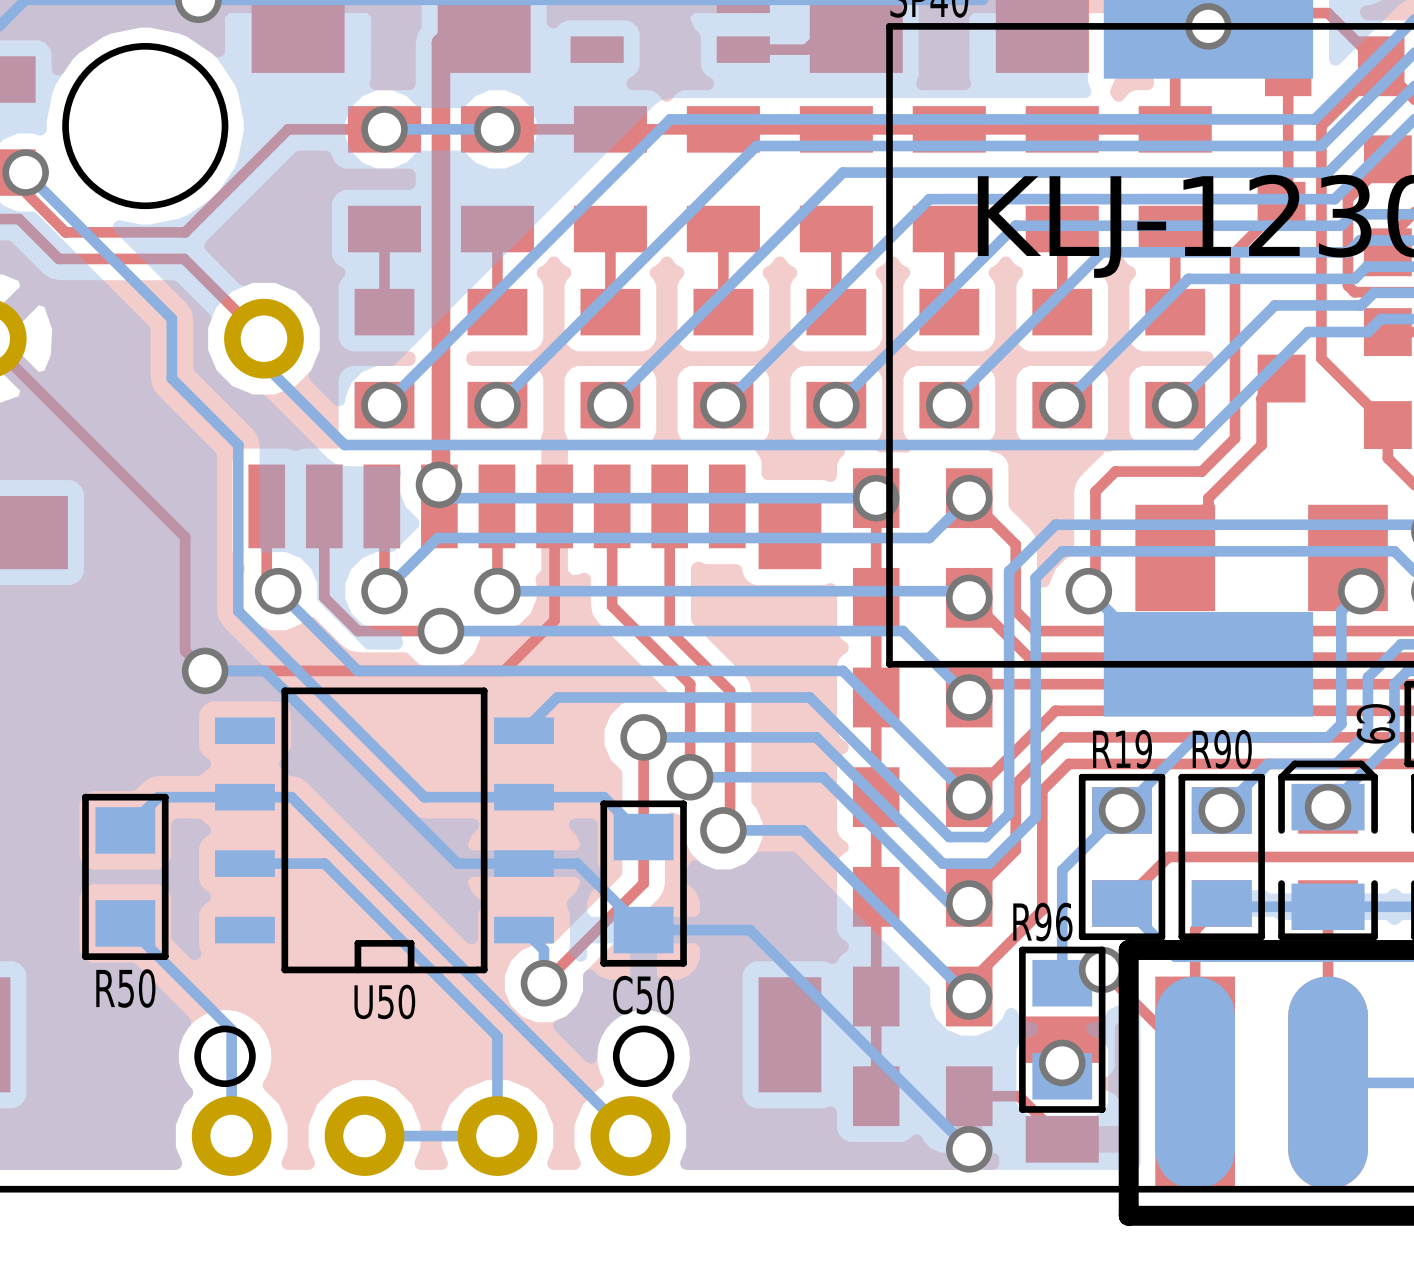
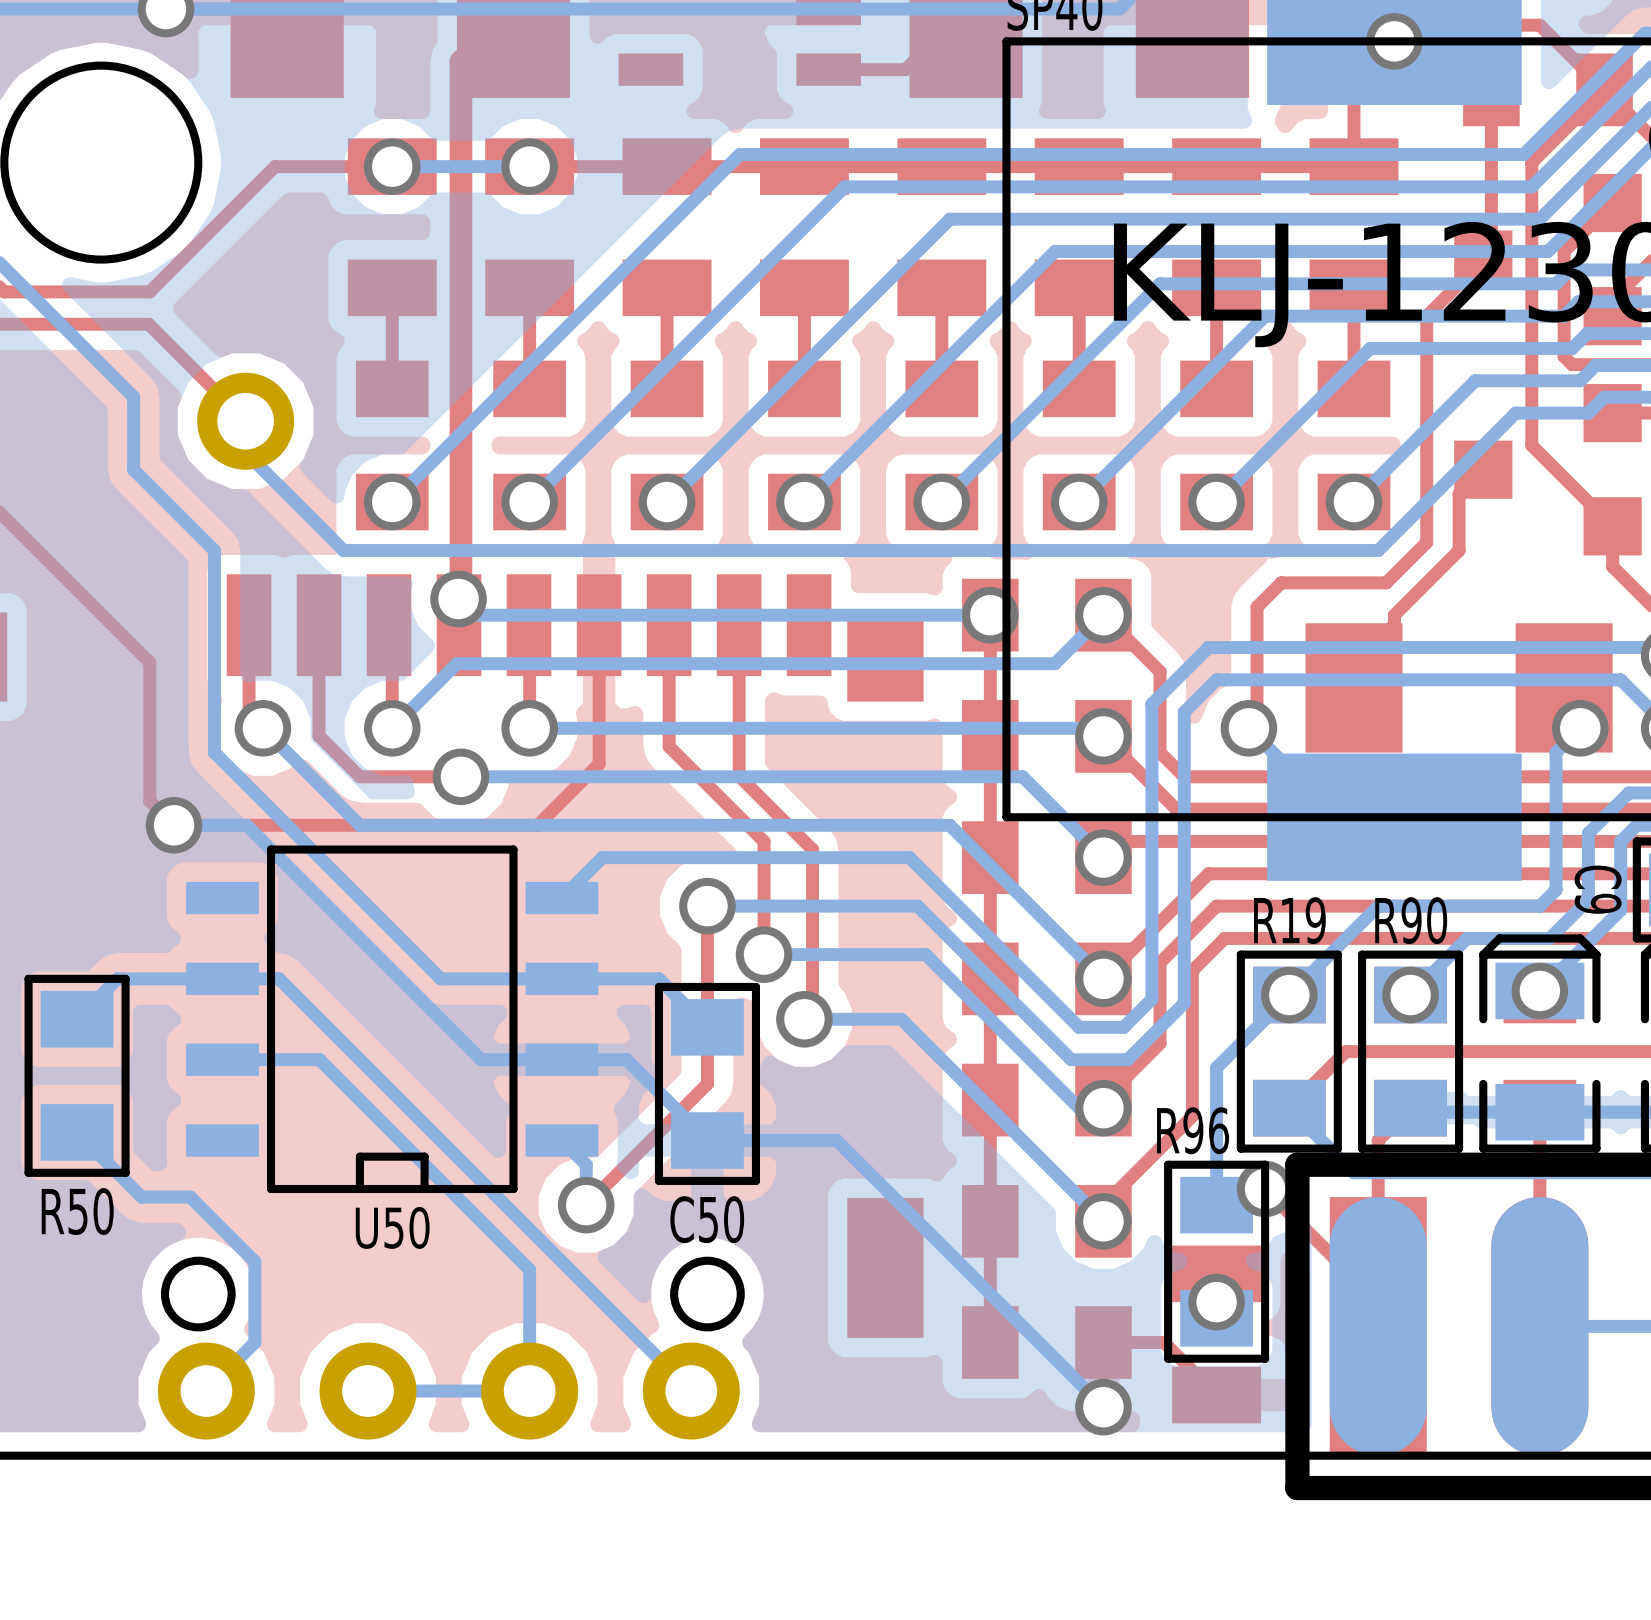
bottom track: (178, 976) (231, 1029) (231, 1136) -> (141, 1197) (190, 1197) (254, 1261) (254, 1342) (206, 1391)

